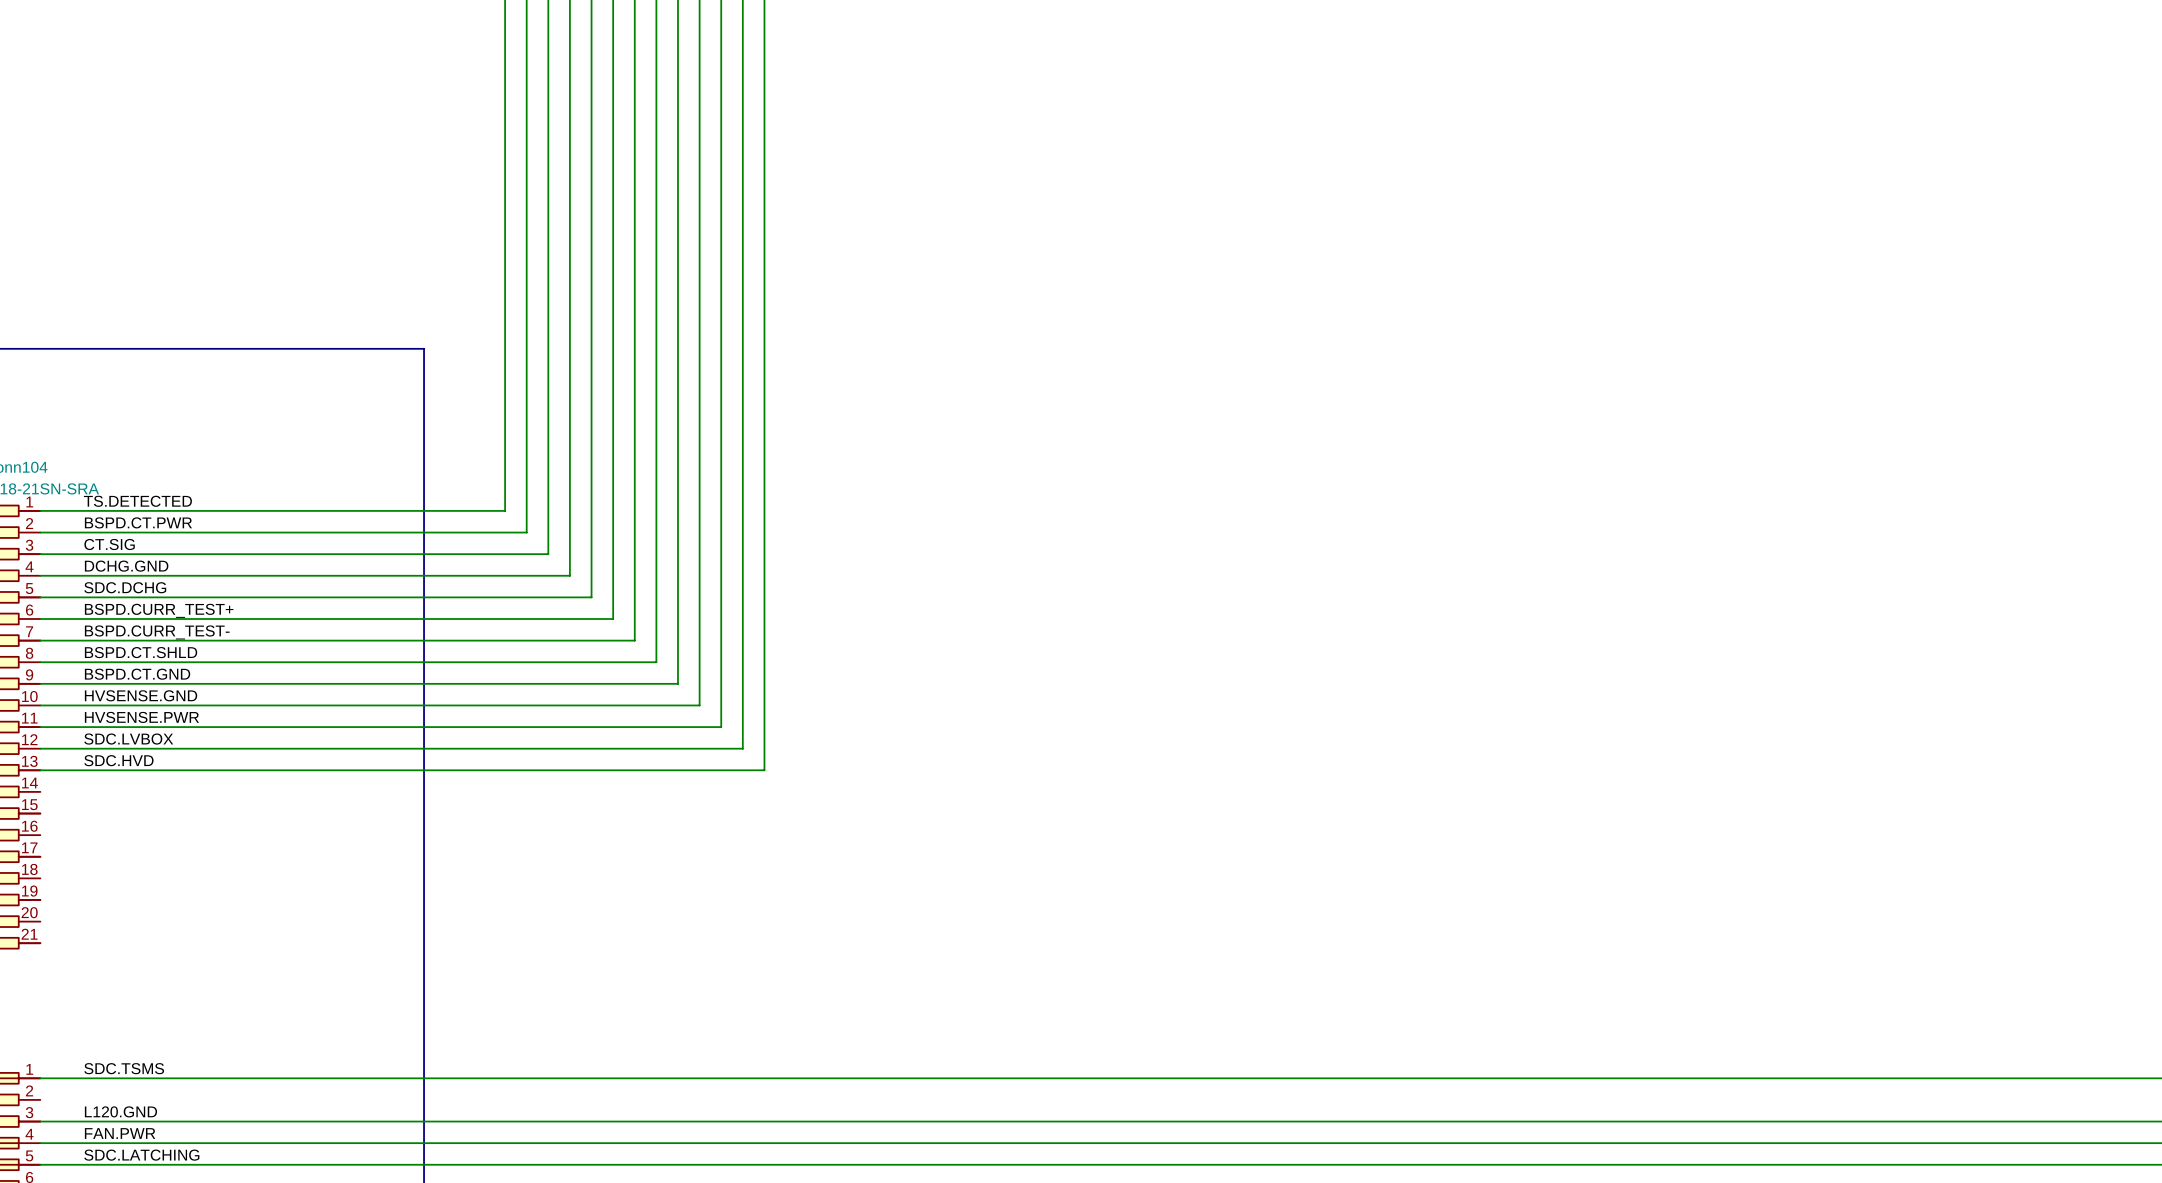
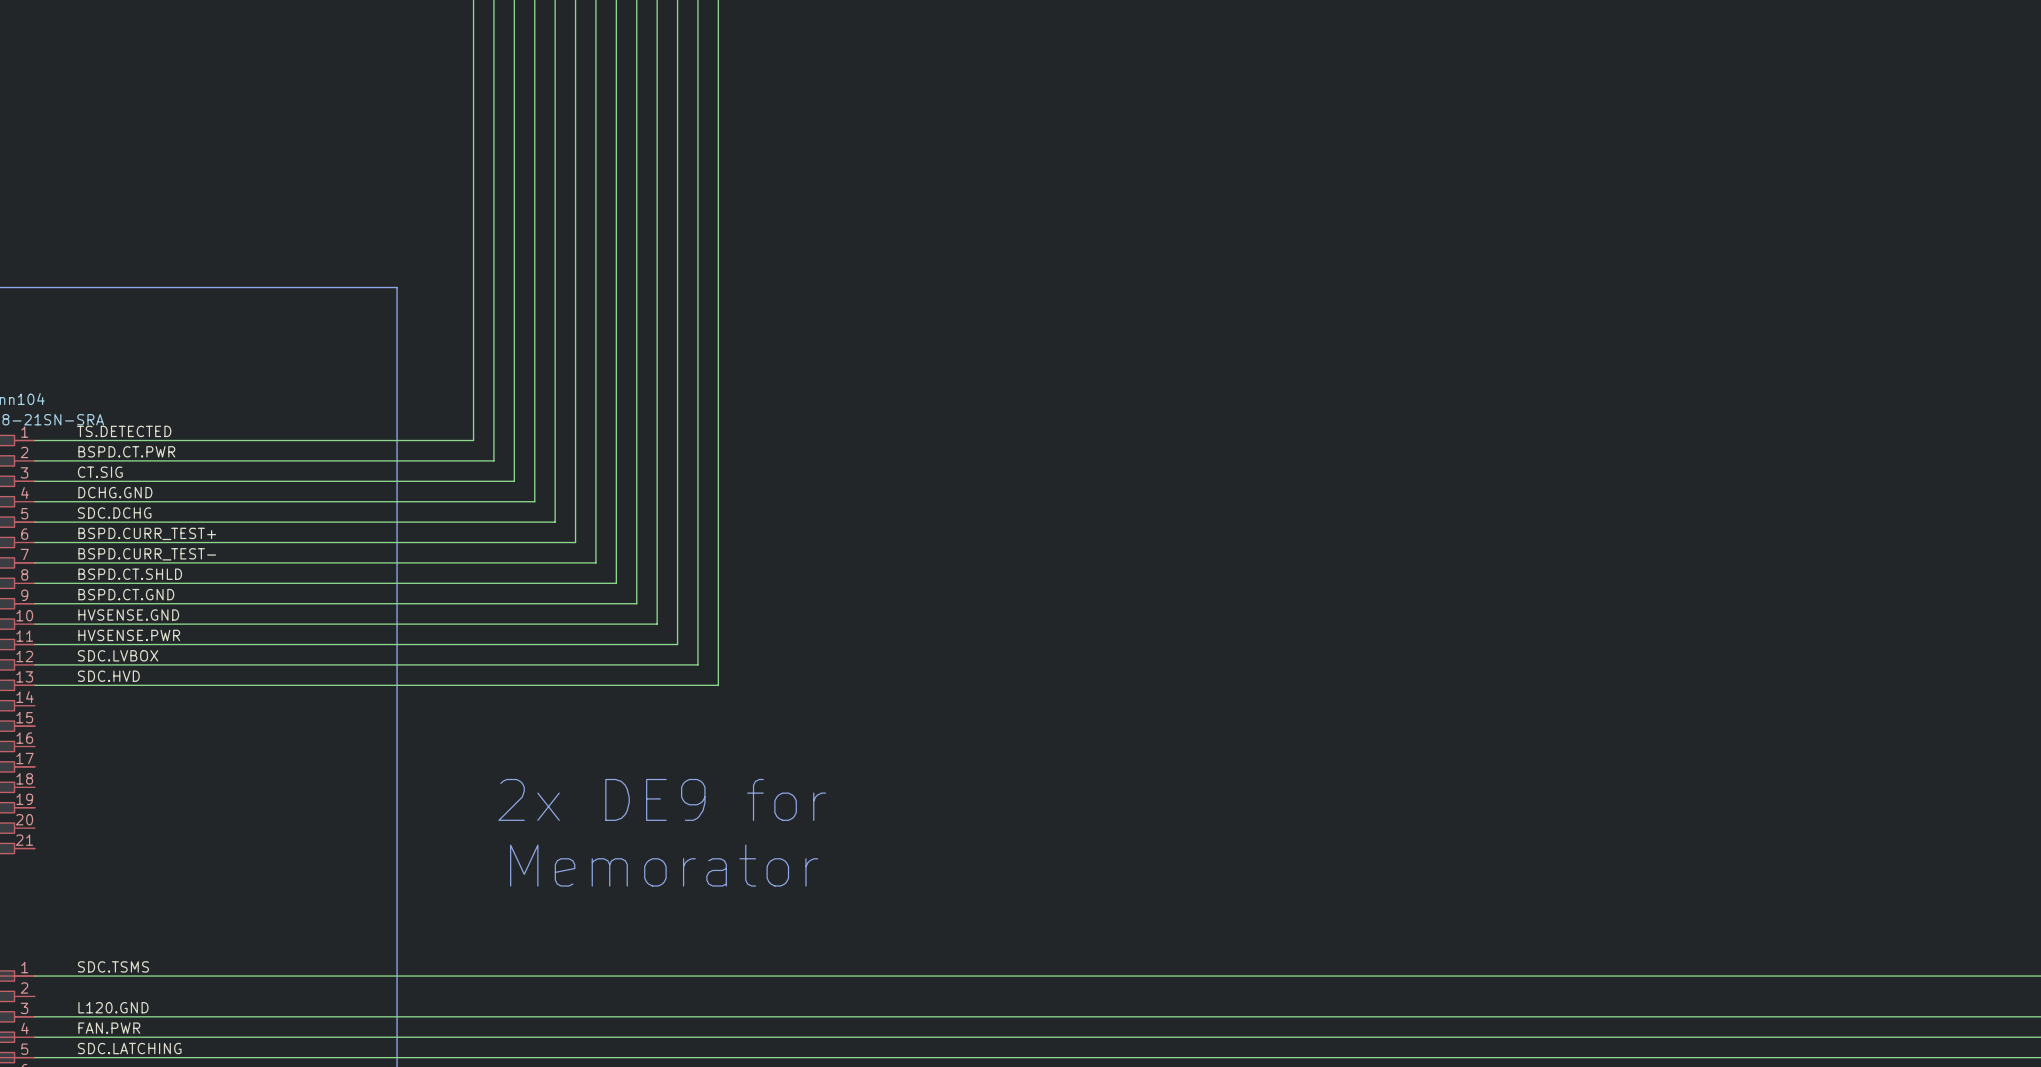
text: none -> 2x DE9 for (662, 799)
text: none -> Memorator (664, 865)

